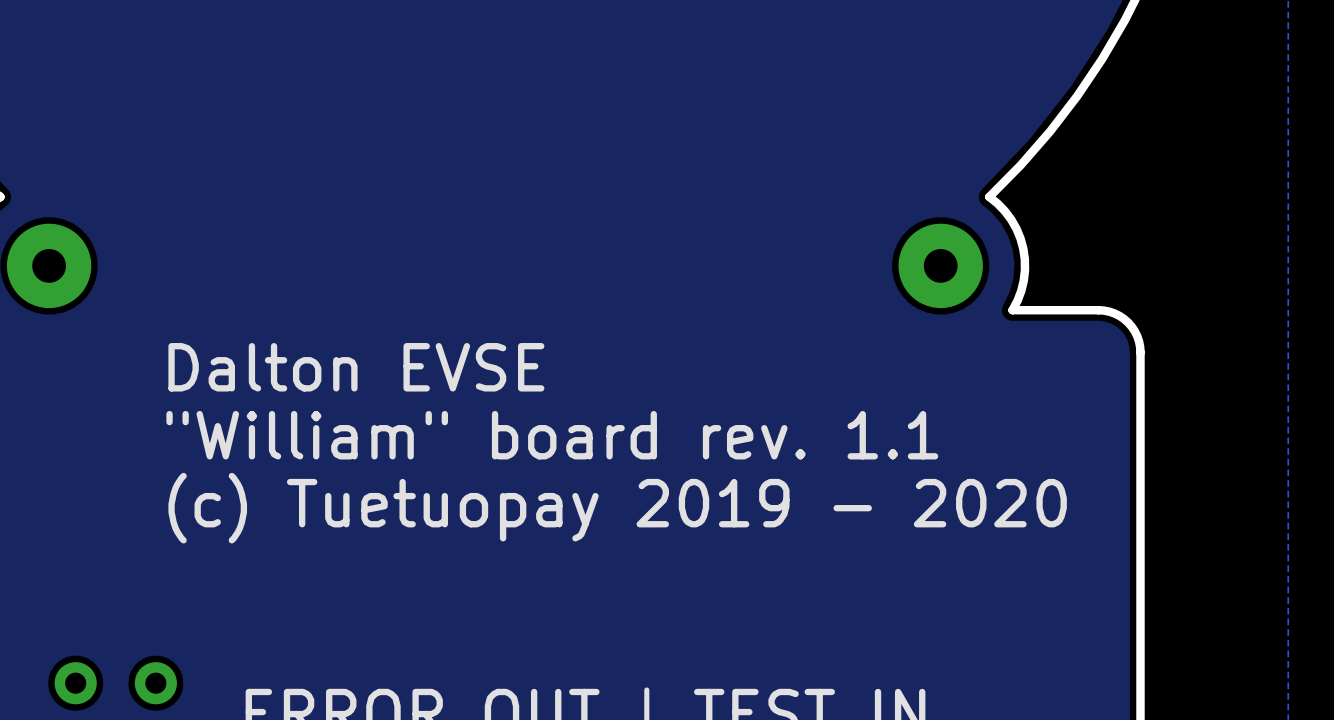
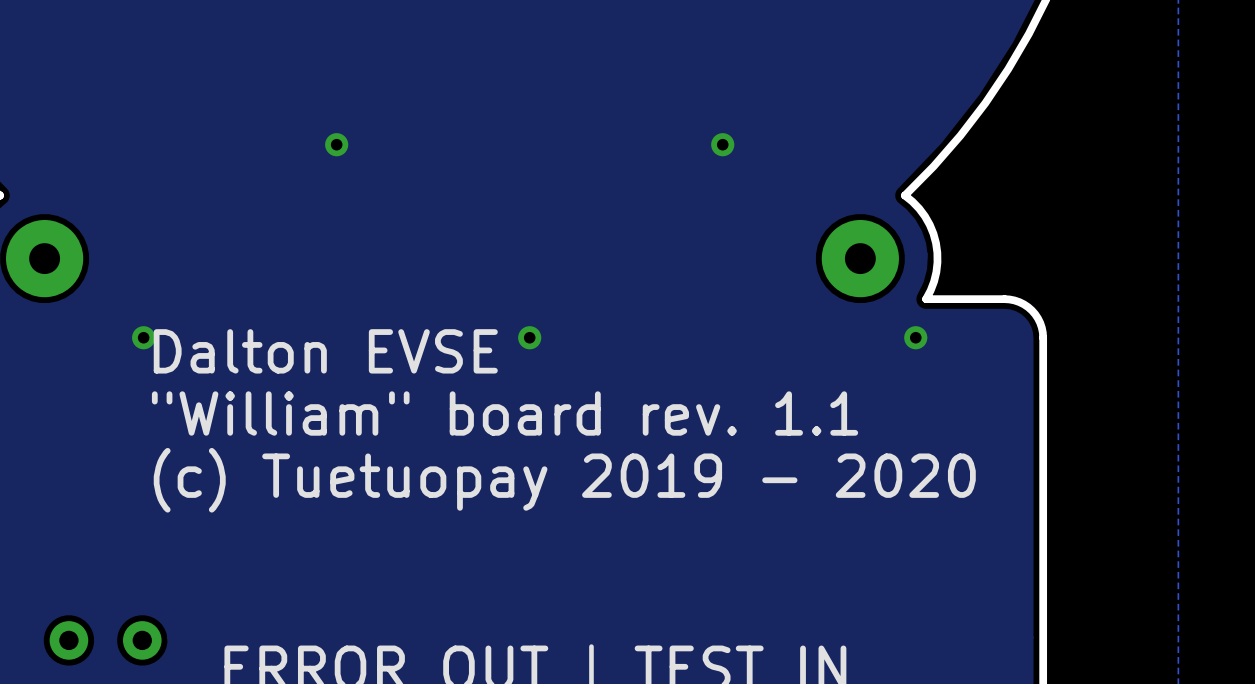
via: none -> (336, 144)
via: none -> (722, 144)
via: none -> (143, 337)
via: none -> (529, 337)
via: none -> (915, 337)

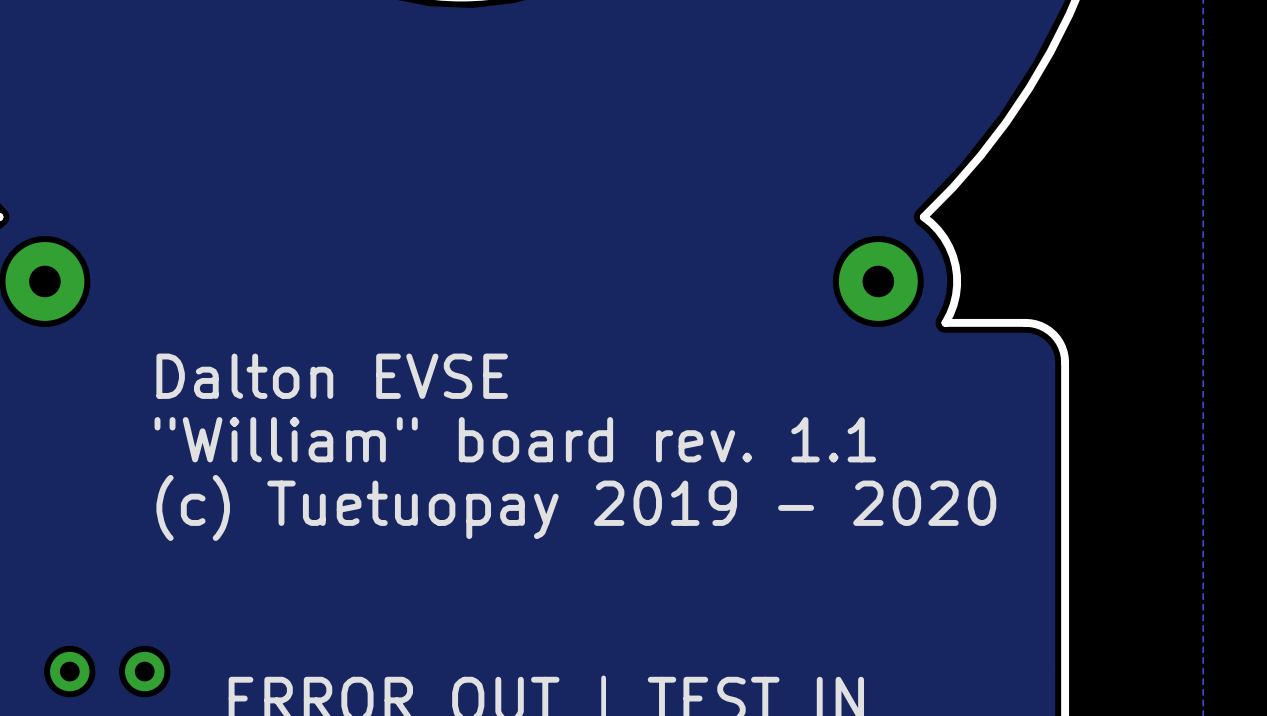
via: (336, 144) -> none
via: (722, 144) -> none
via: (143, 337) -> none
via: (529, 337) -> none
via: (915, 337) -> none

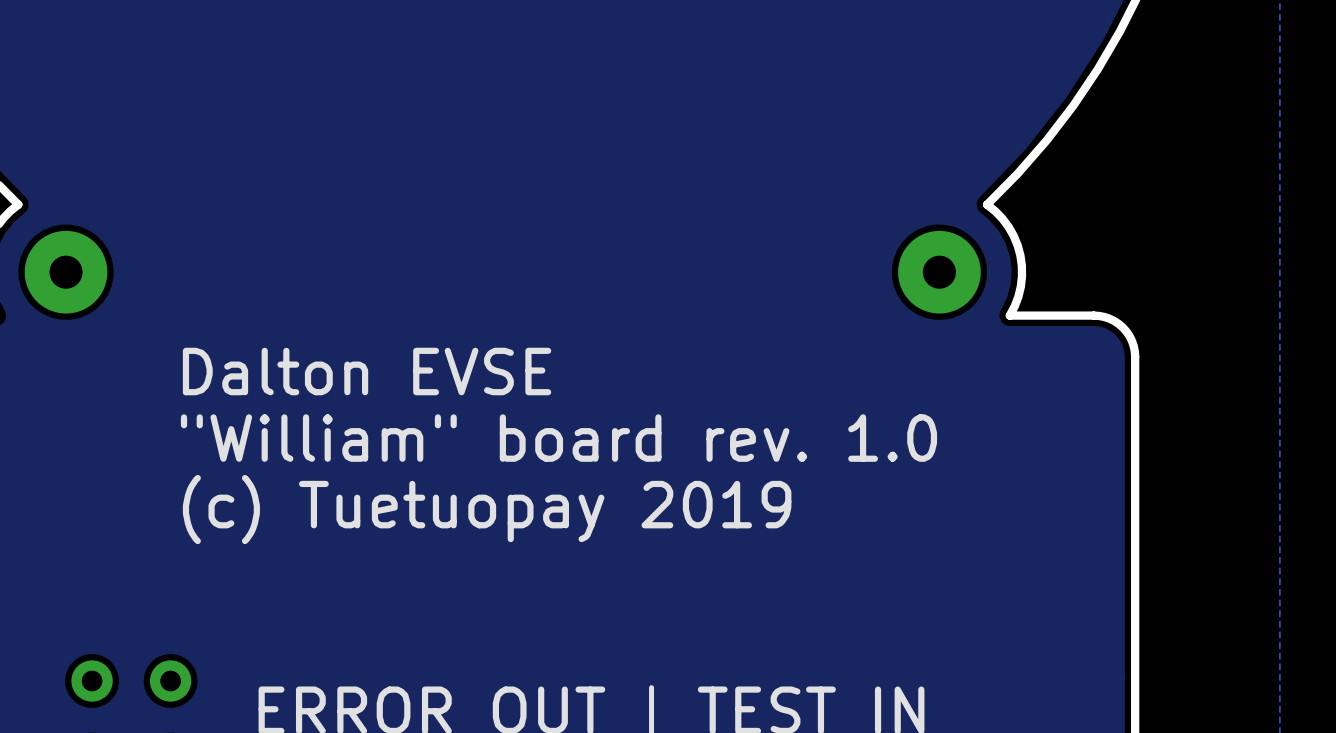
text: "William" board rev. 1.1 (515, 439) -> "William" board rev. 1.0 (558, 438)
text: (c) Tuetuopay 2019 - 2020 (576, 507) -> (c) Tuetuopay 2019 (487, 509)

